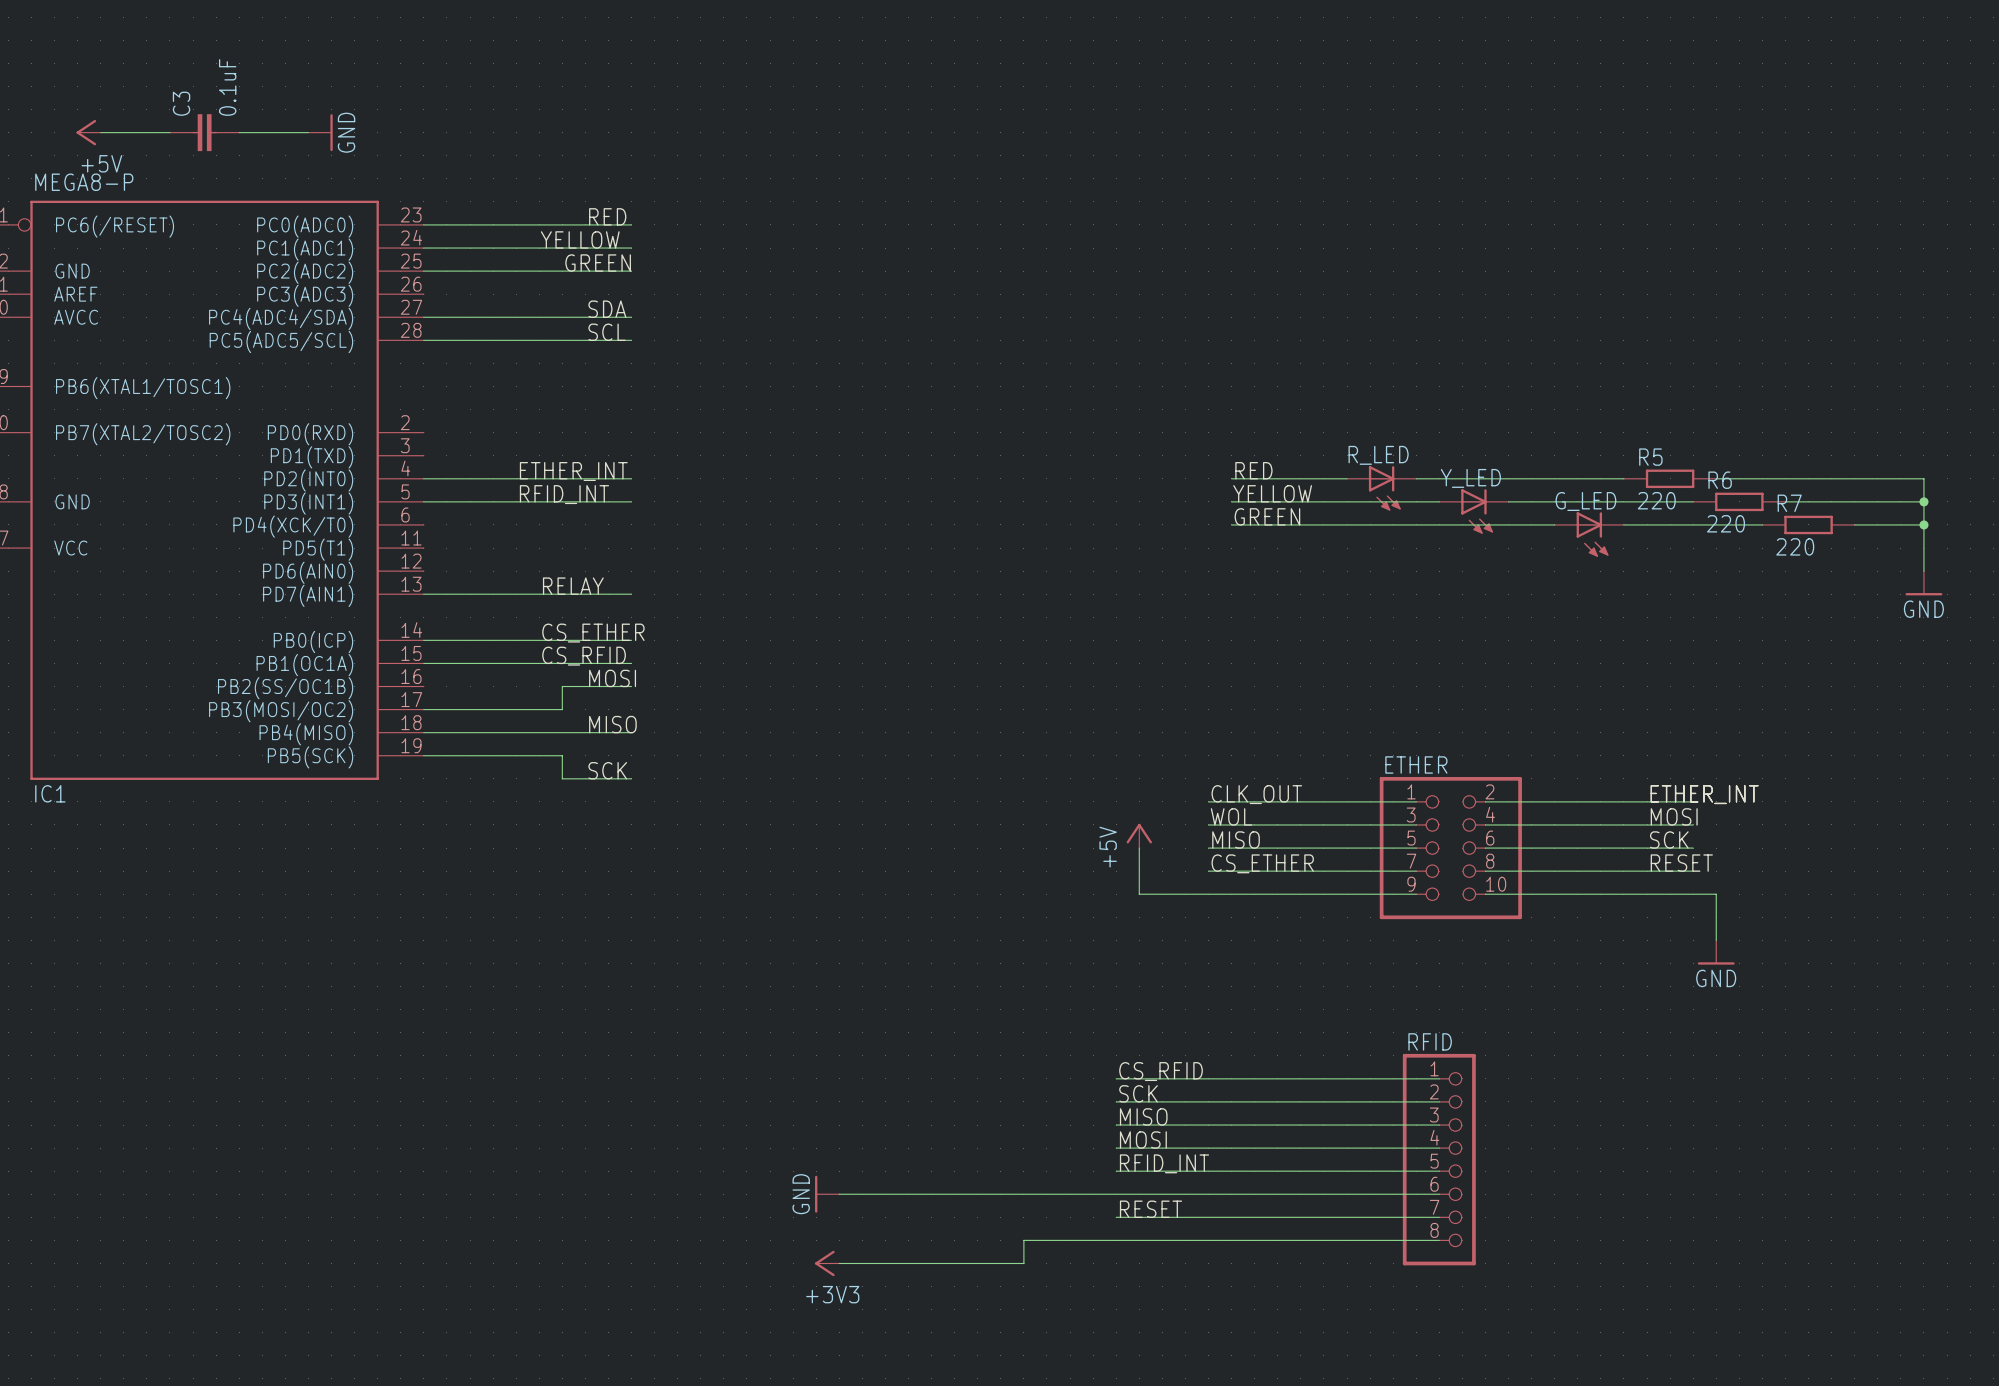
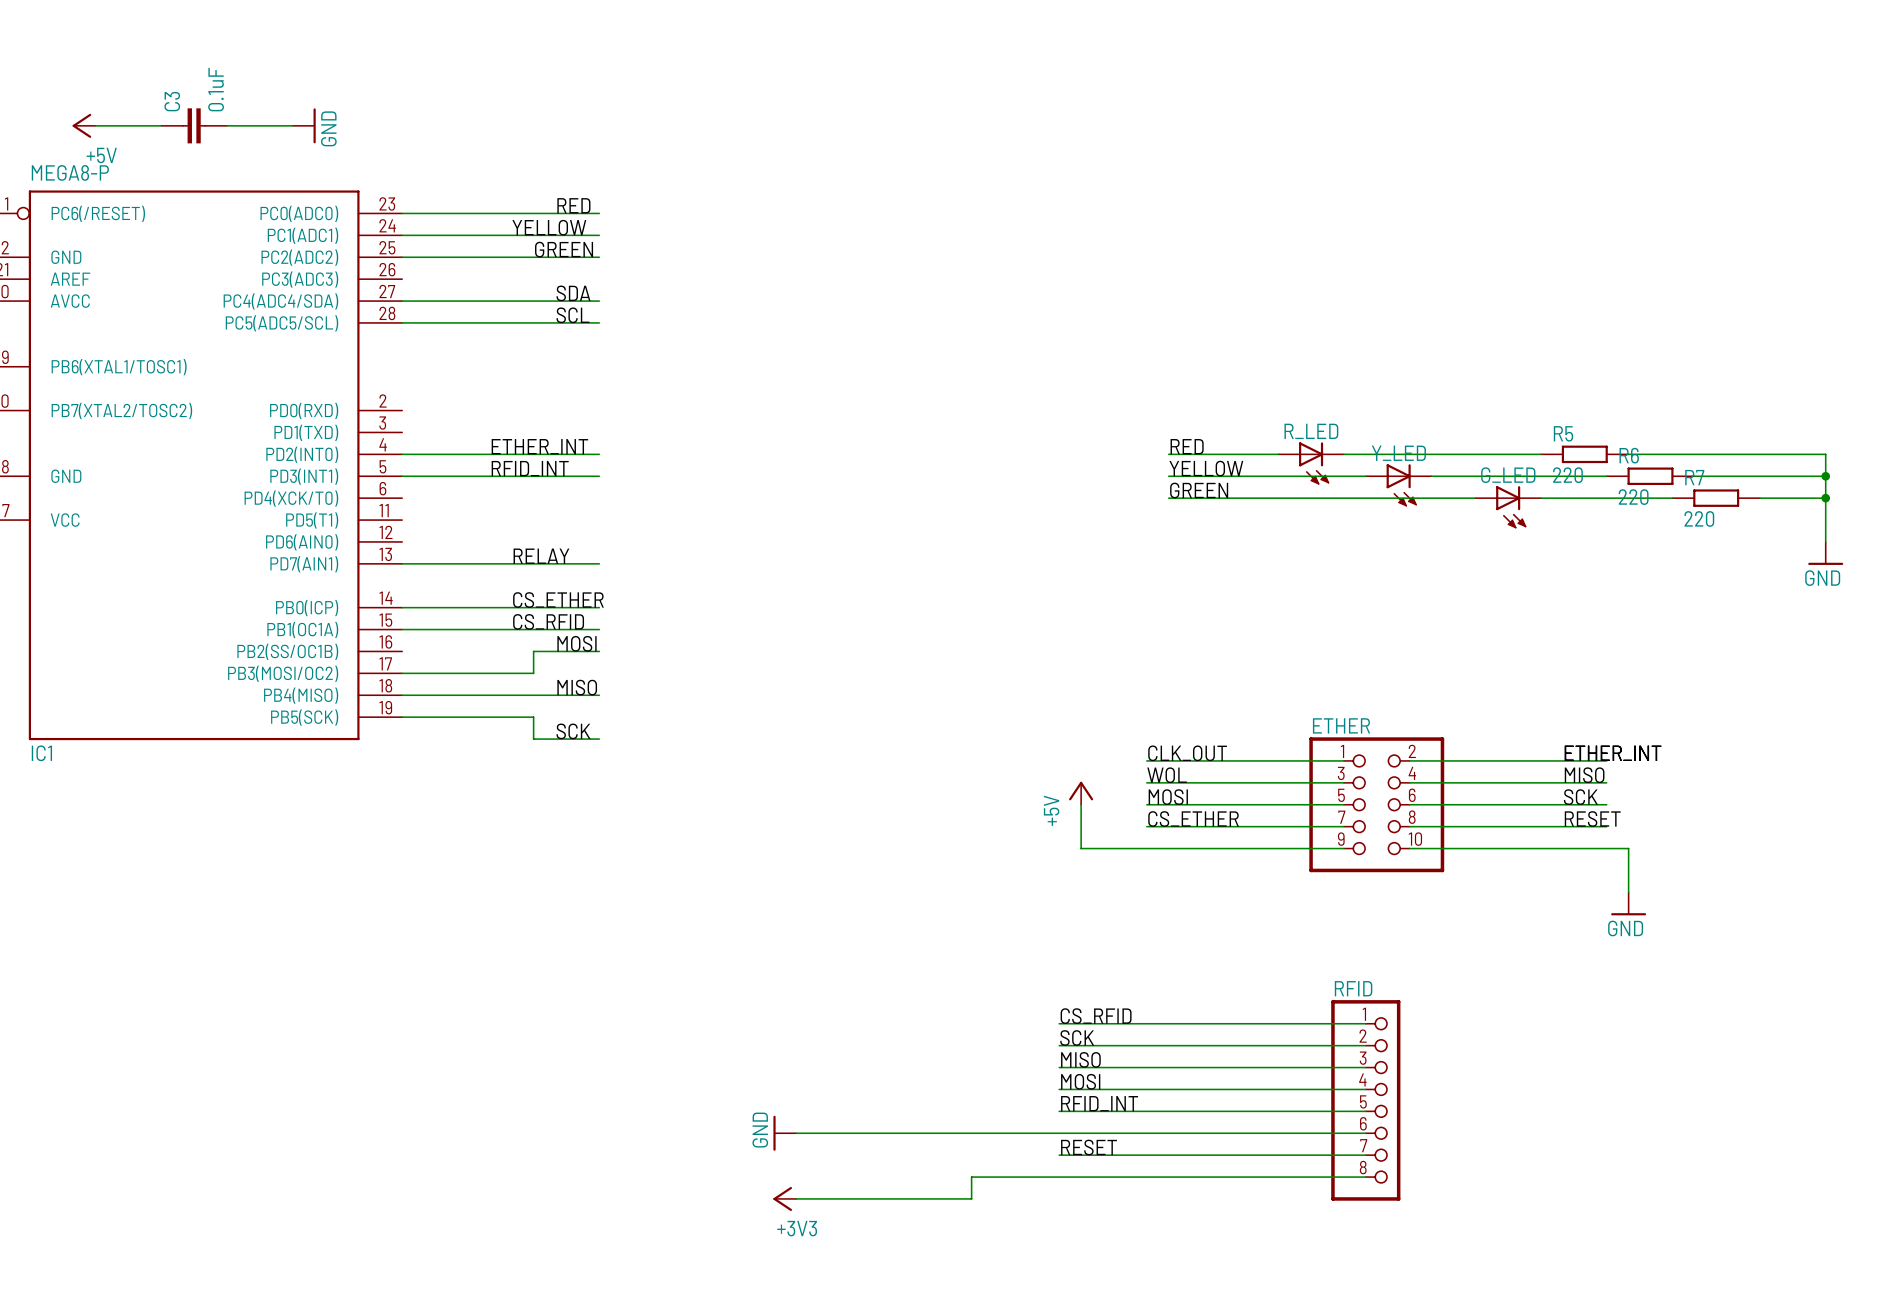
label: MOSI (1674, 816) -> MISO (1584, 775)
label: MISO (1236, 839) -> MOSI (1168, 797)

